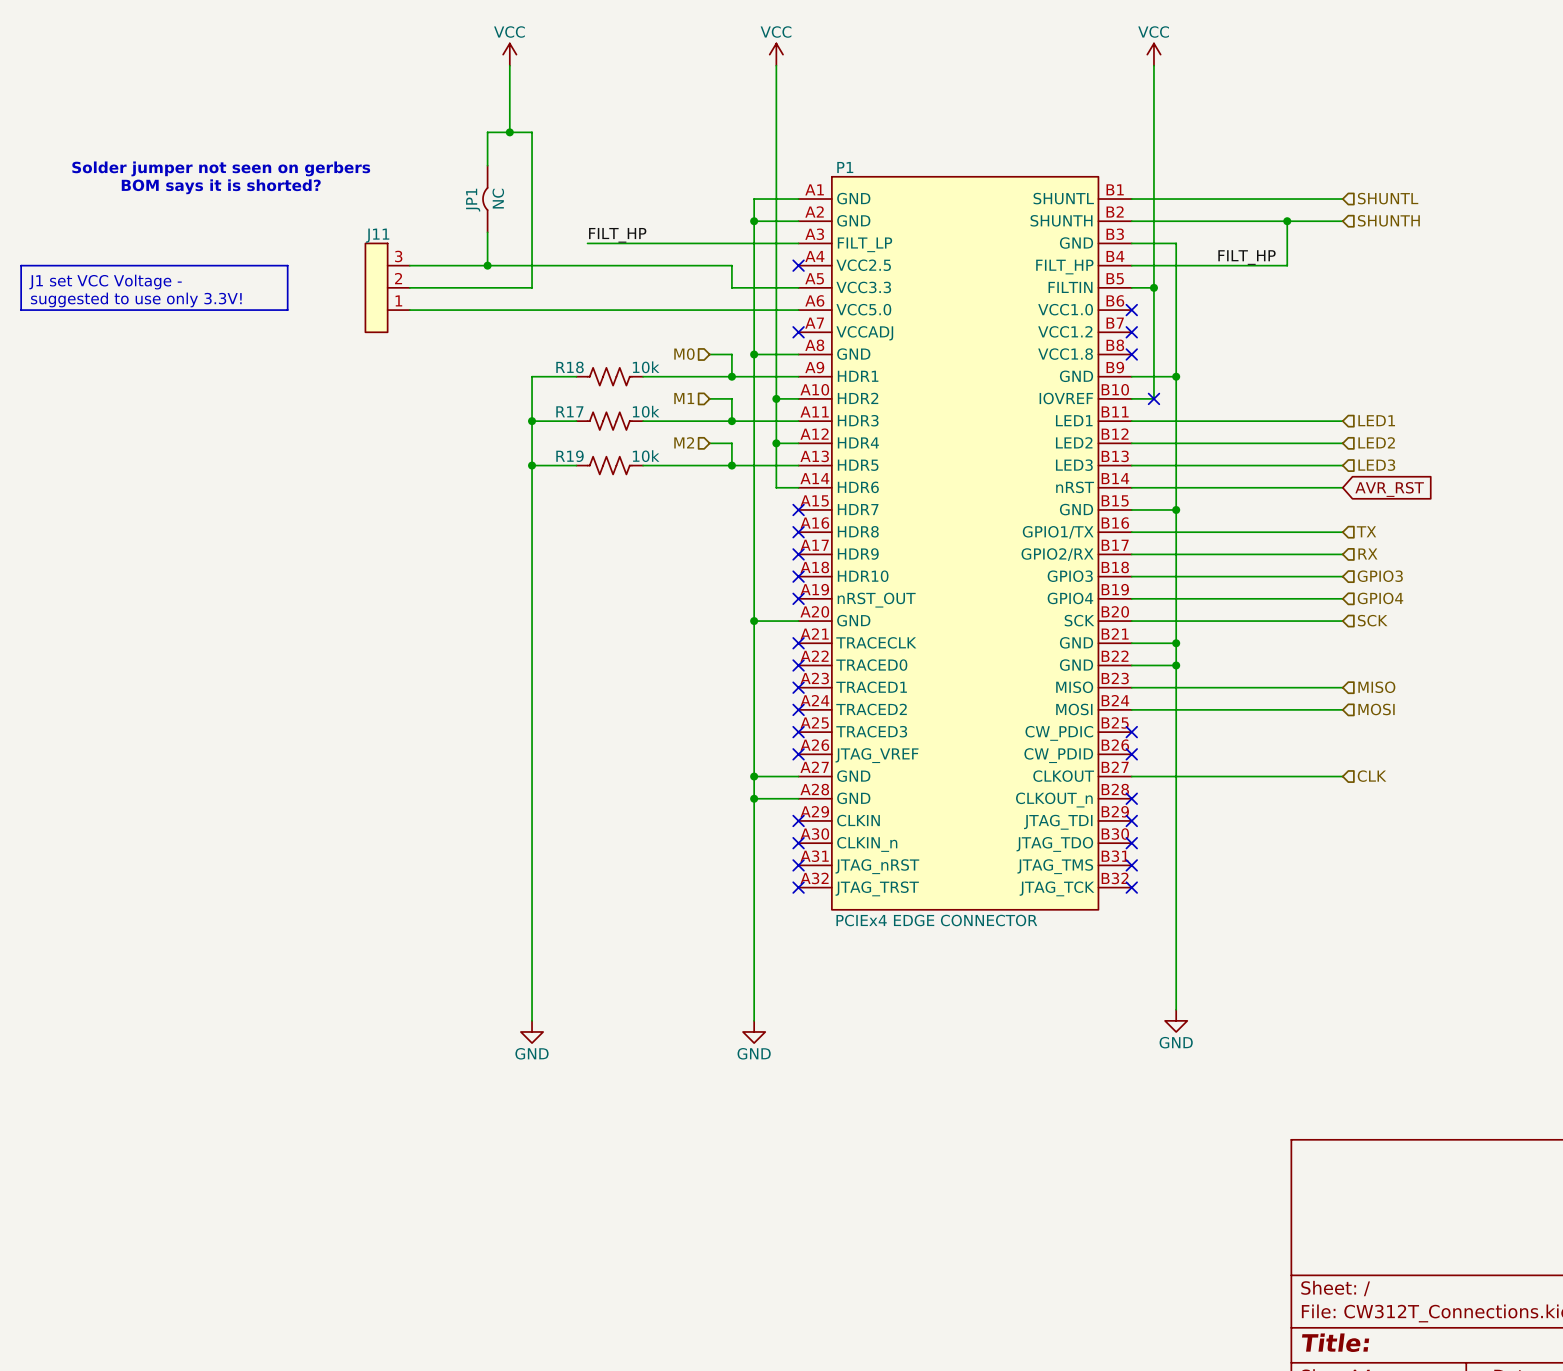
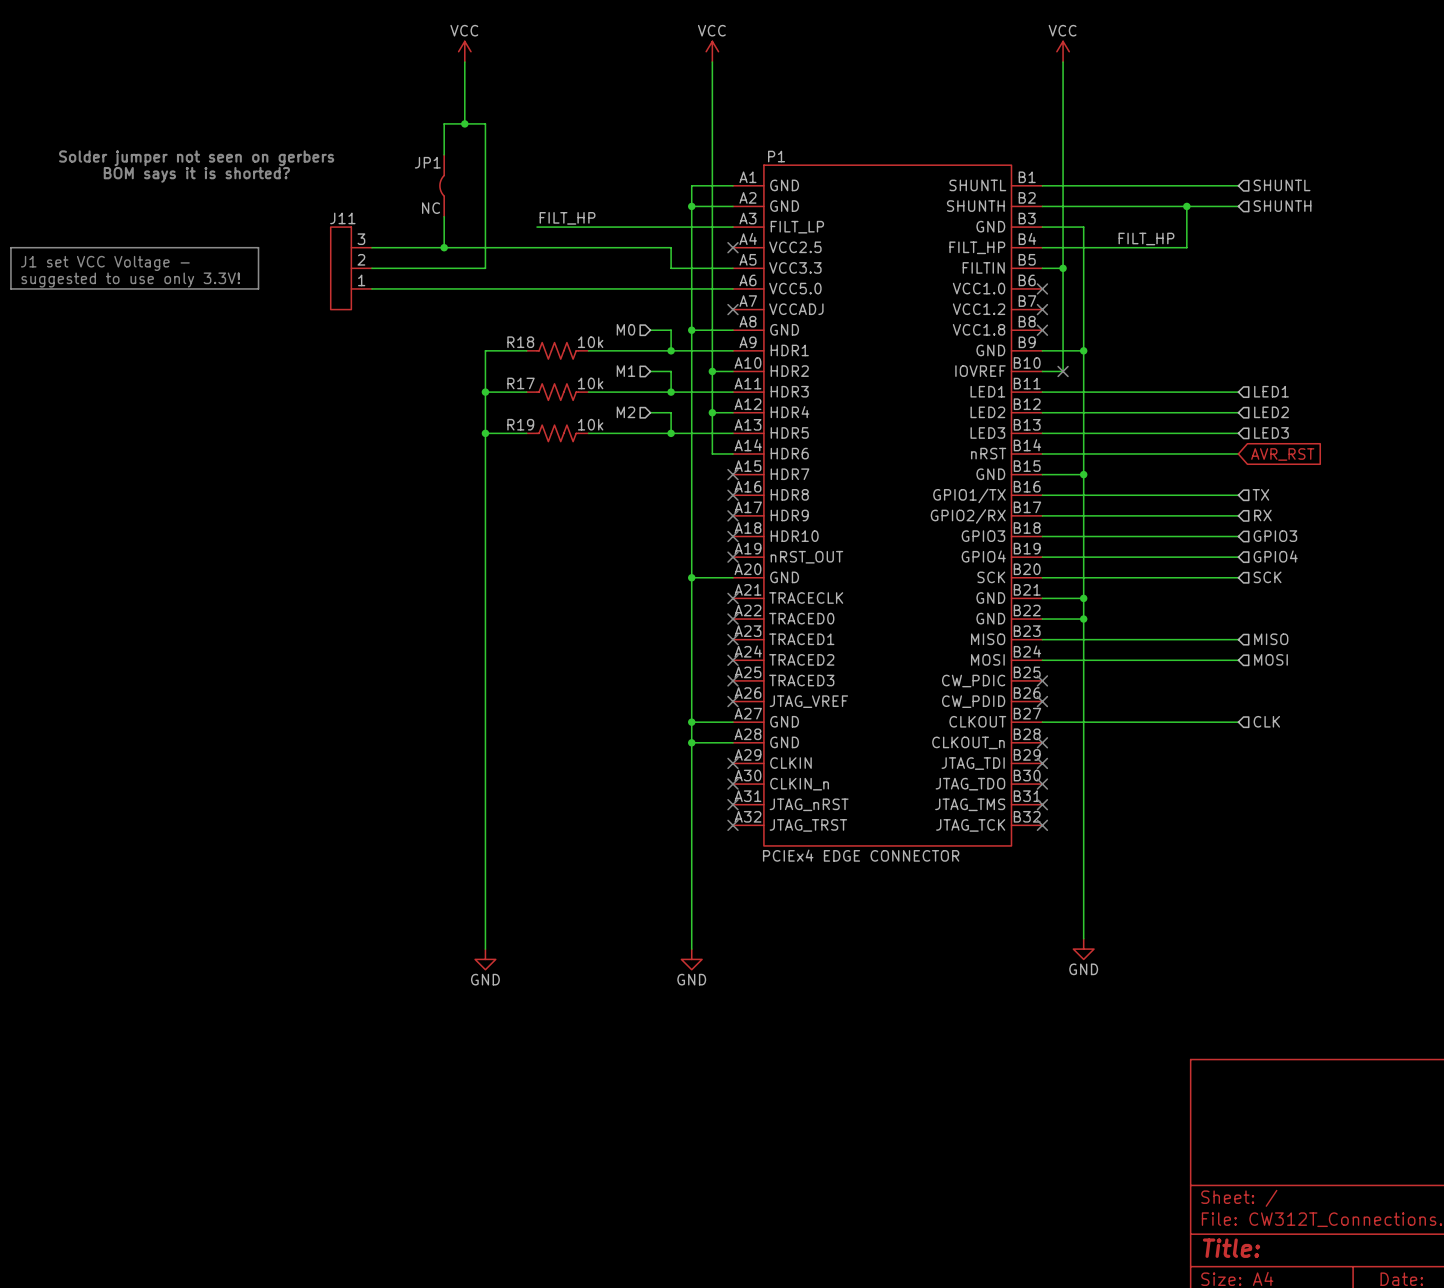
JP1 text rotation: 0° (498, 198) -> 90° clockwise (431, 208)
JP1 text position: NC (498, 198) -> NC (431, 208)
JP1 name rotation: 0° (473, 200) -> 90° clockwise (427, 162)

